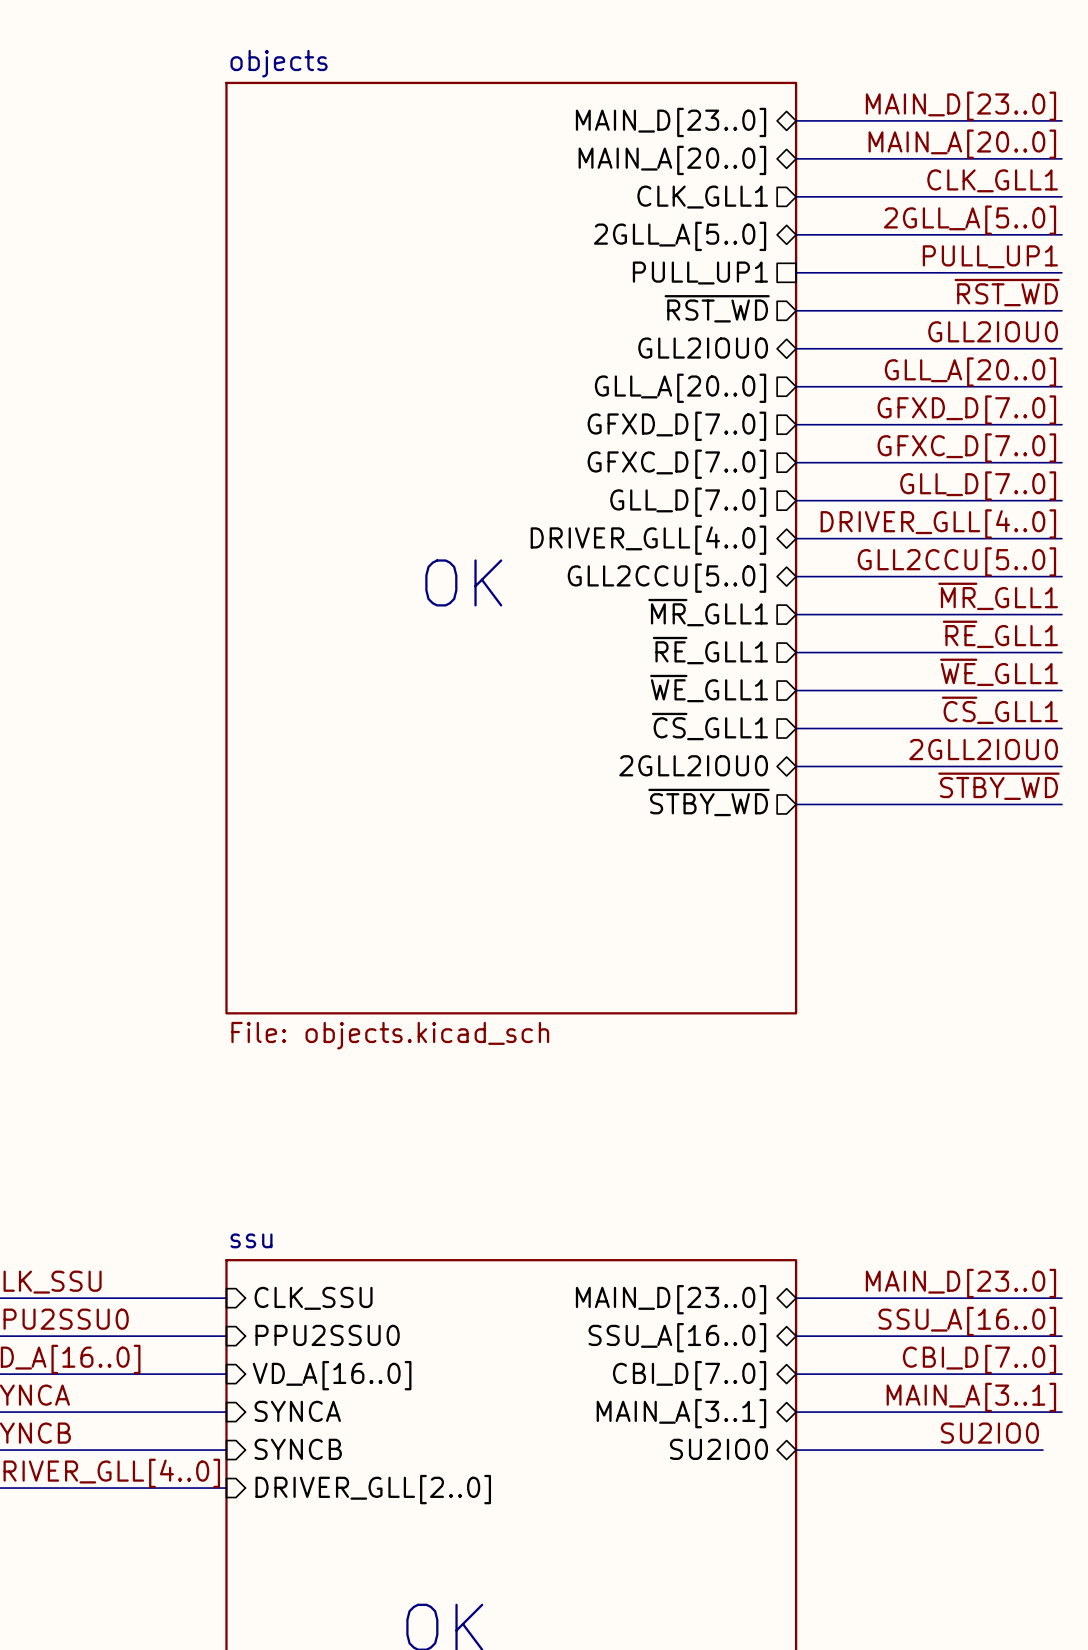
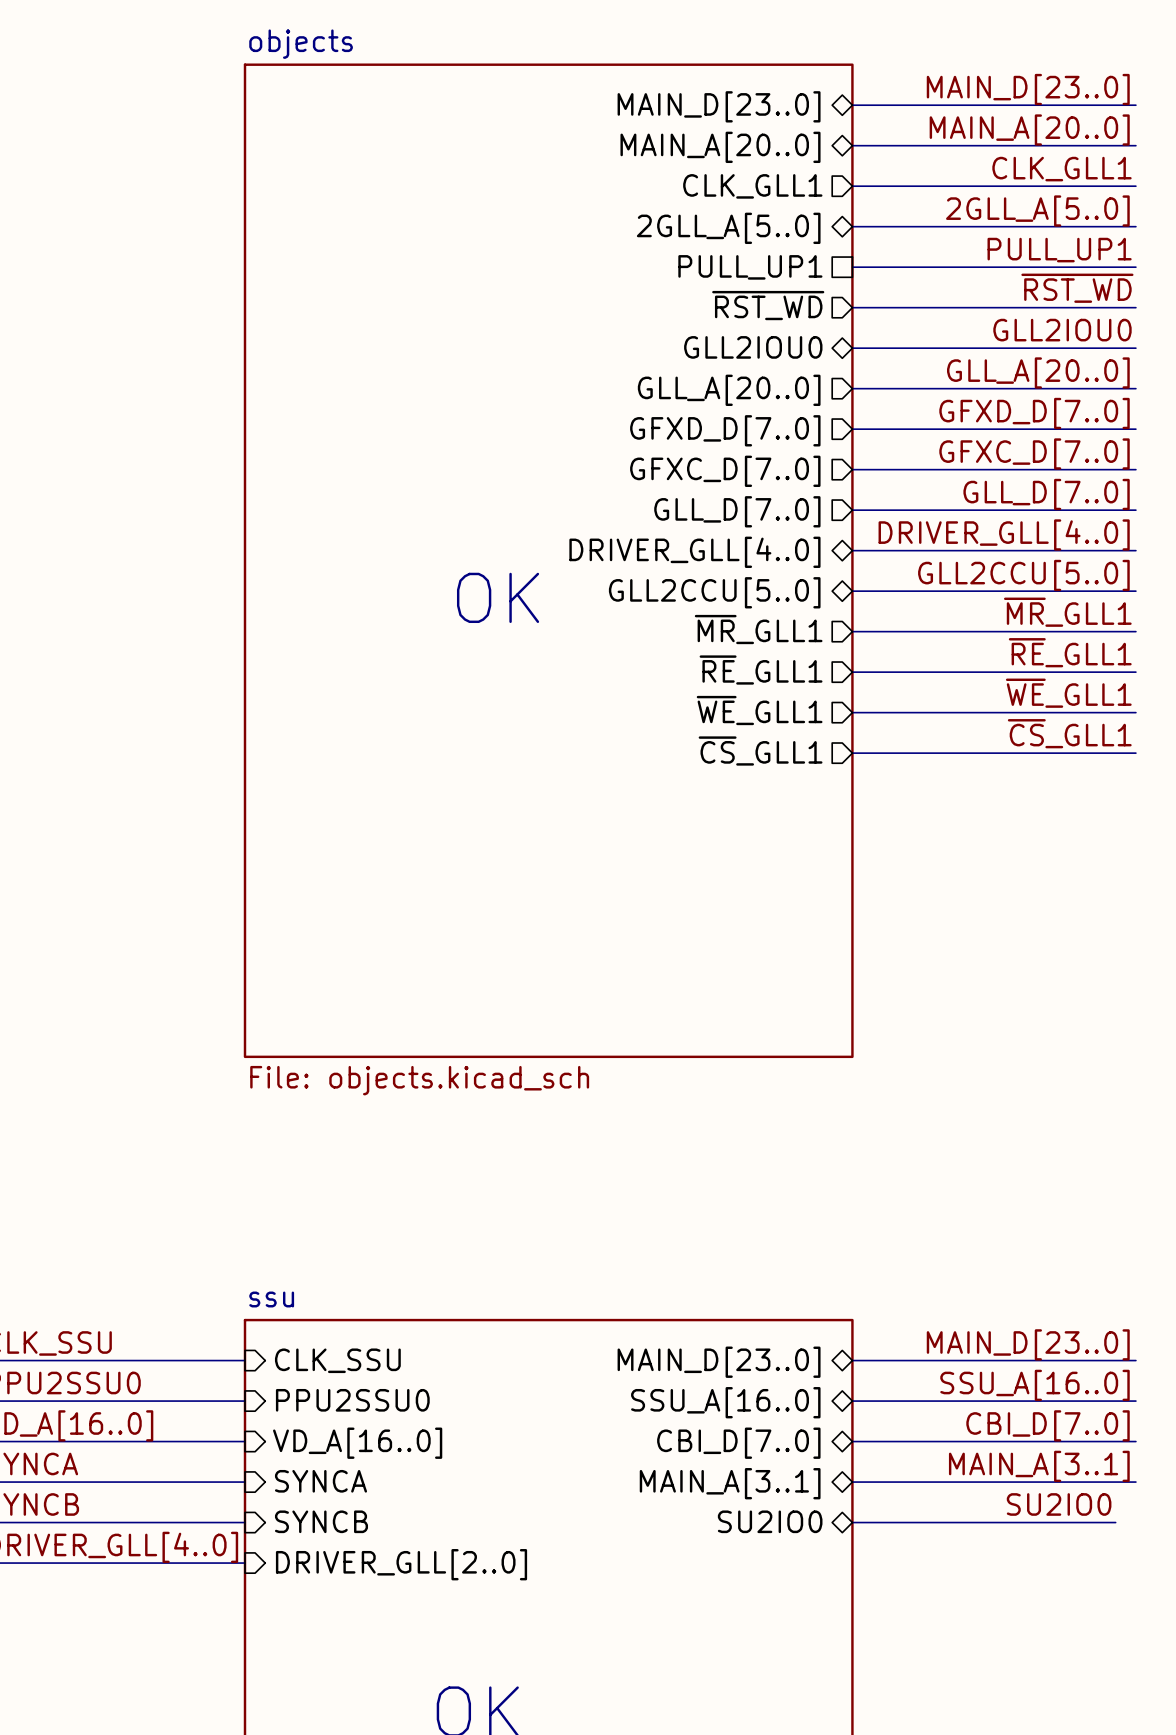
label: 2GLL2IOU0 (983, 749) -> none
sheet pin: 2GLL2IOU0 (693, 765) -> none
wire: (796, 766) (1061, 766) -> none
label: ~{STBY_WD} (998, 786) -> none
sheet pin: ~{STBY_WD} (709, 802) -> none
wire: (796, 804) (1061, 804) -> none

